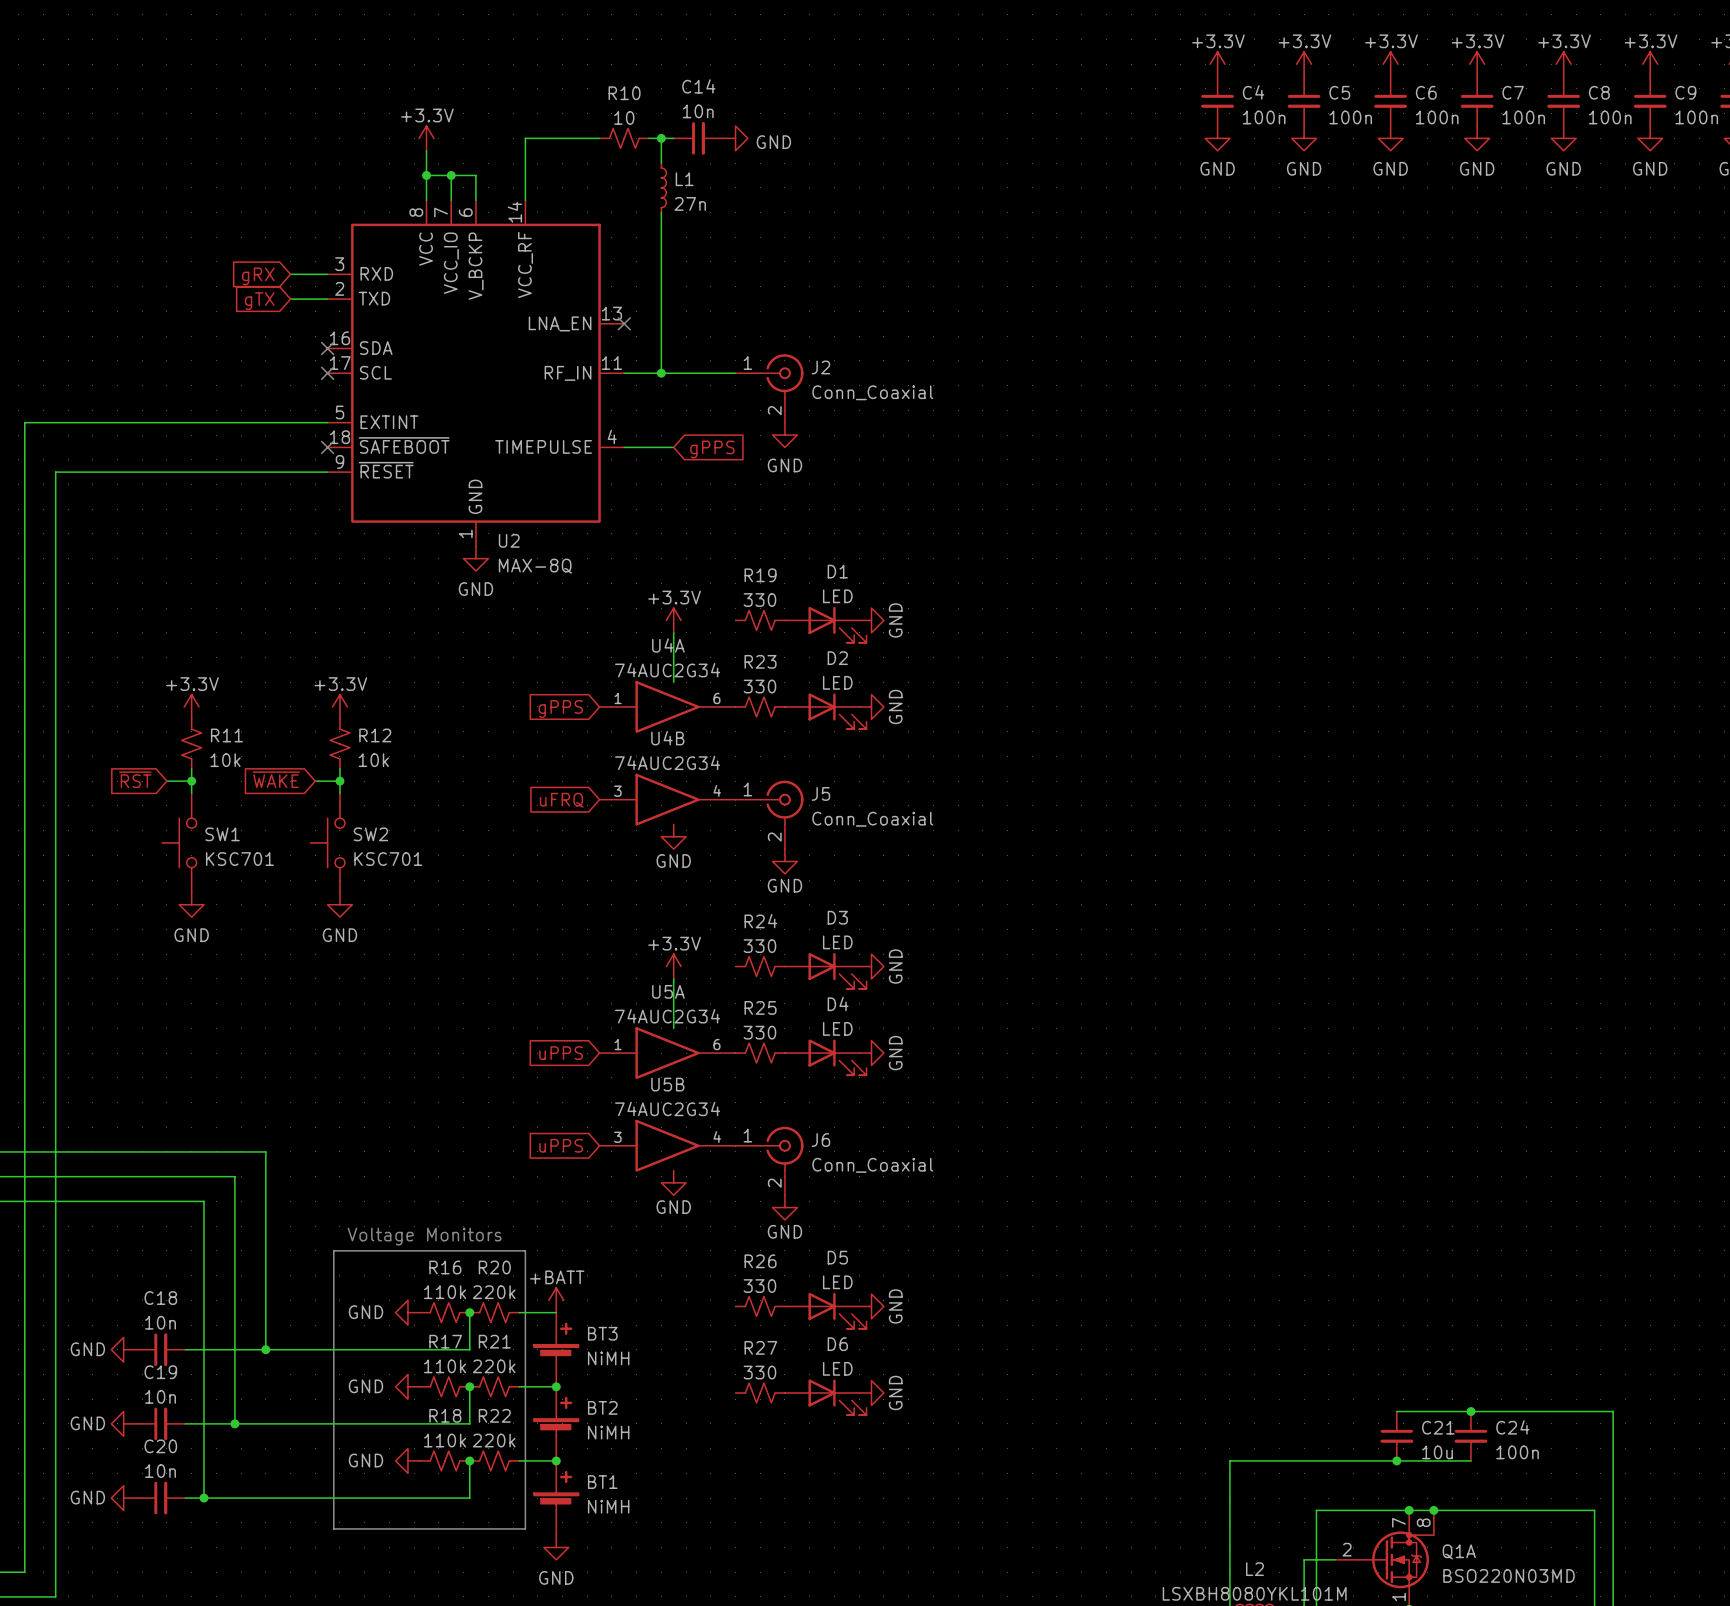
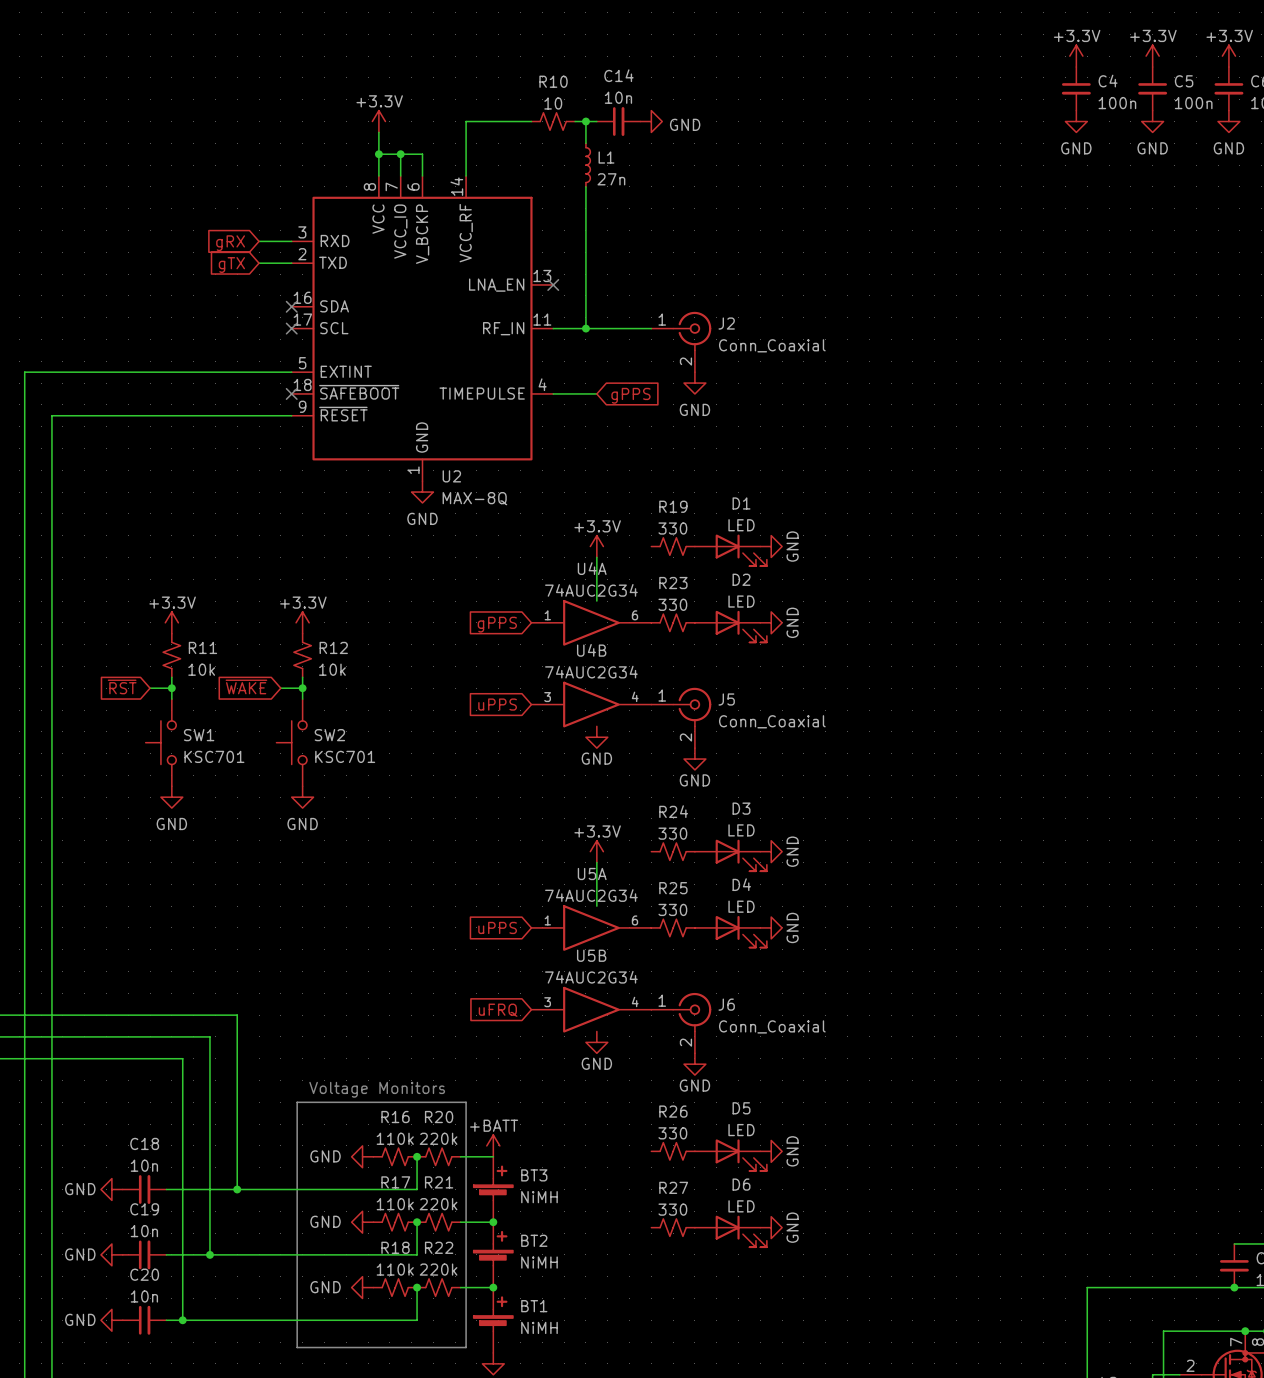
global label: uFRQ (561, 800) -> uPPS (497, 704)
global label: uPPS (561, 1145) -> uFRQ (498, 1010)

